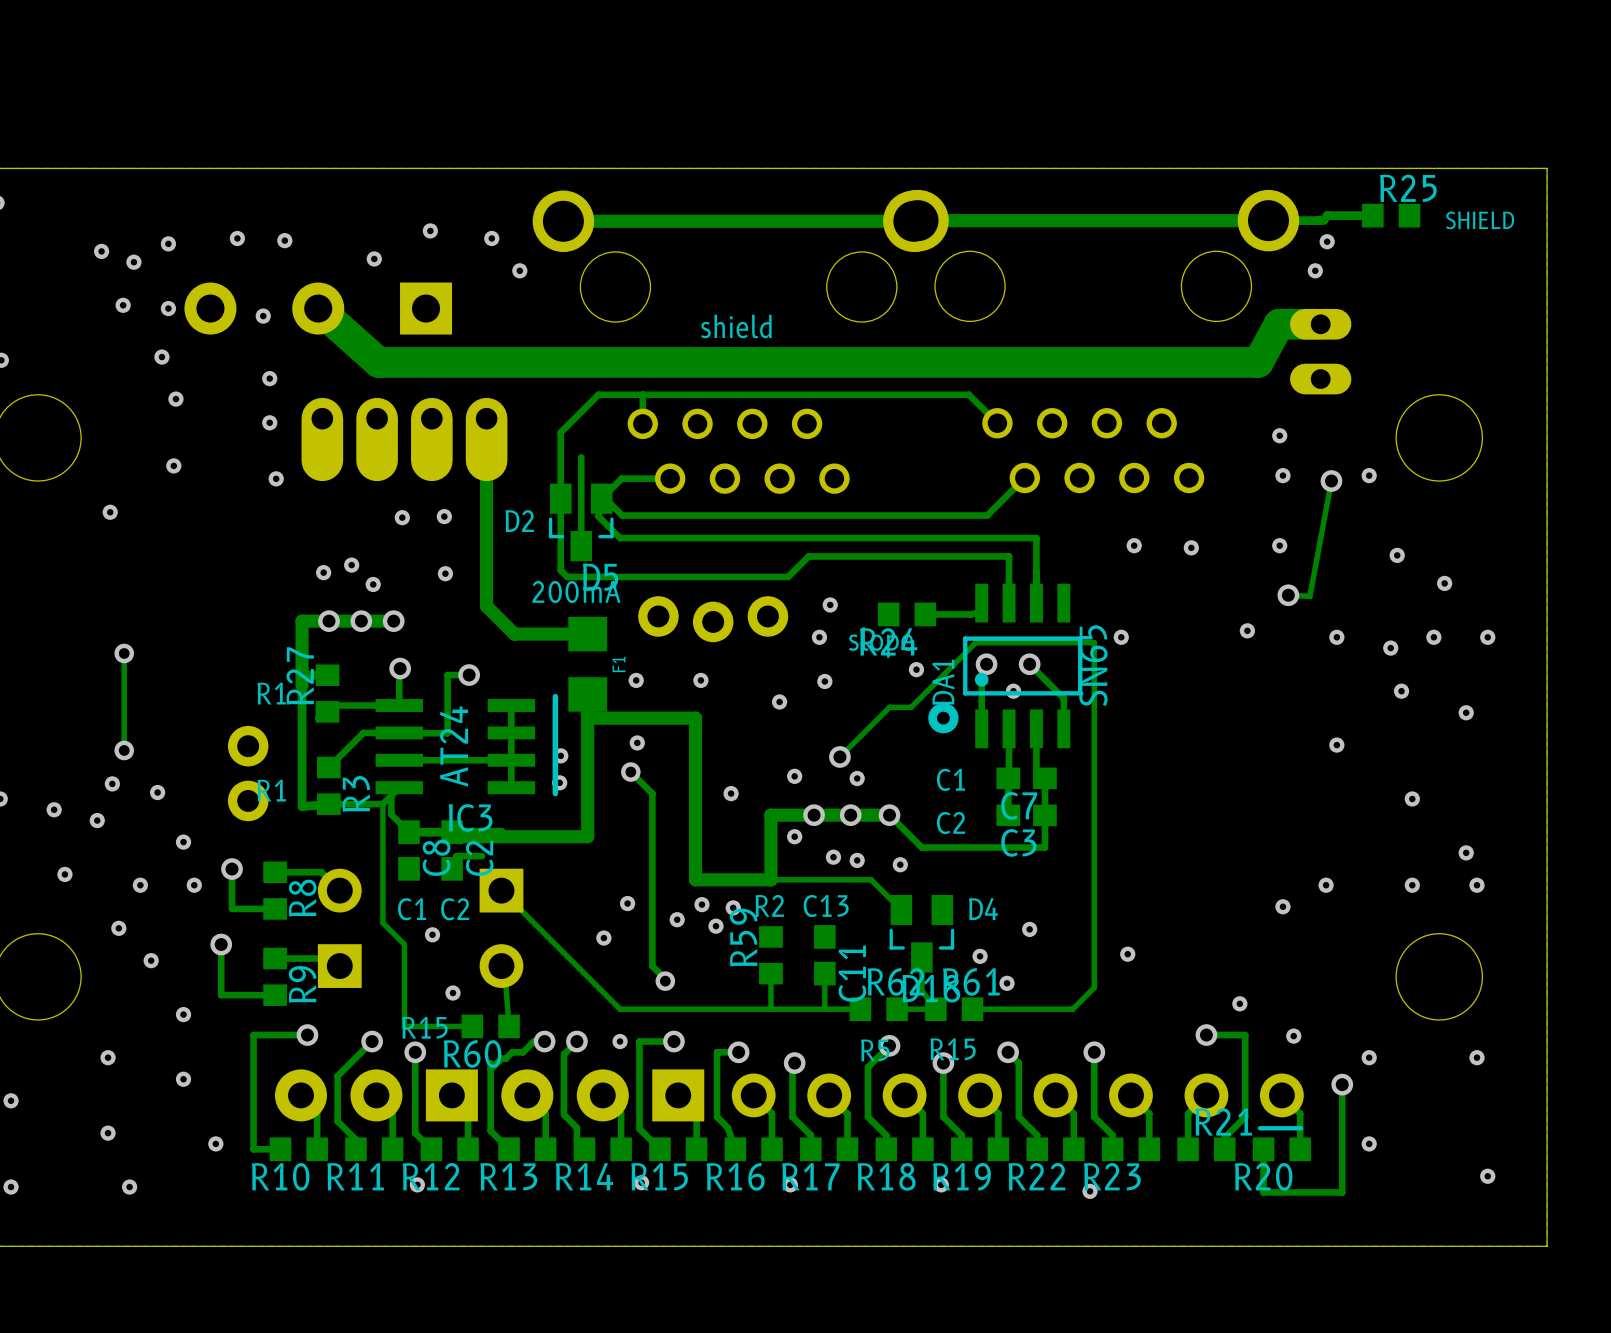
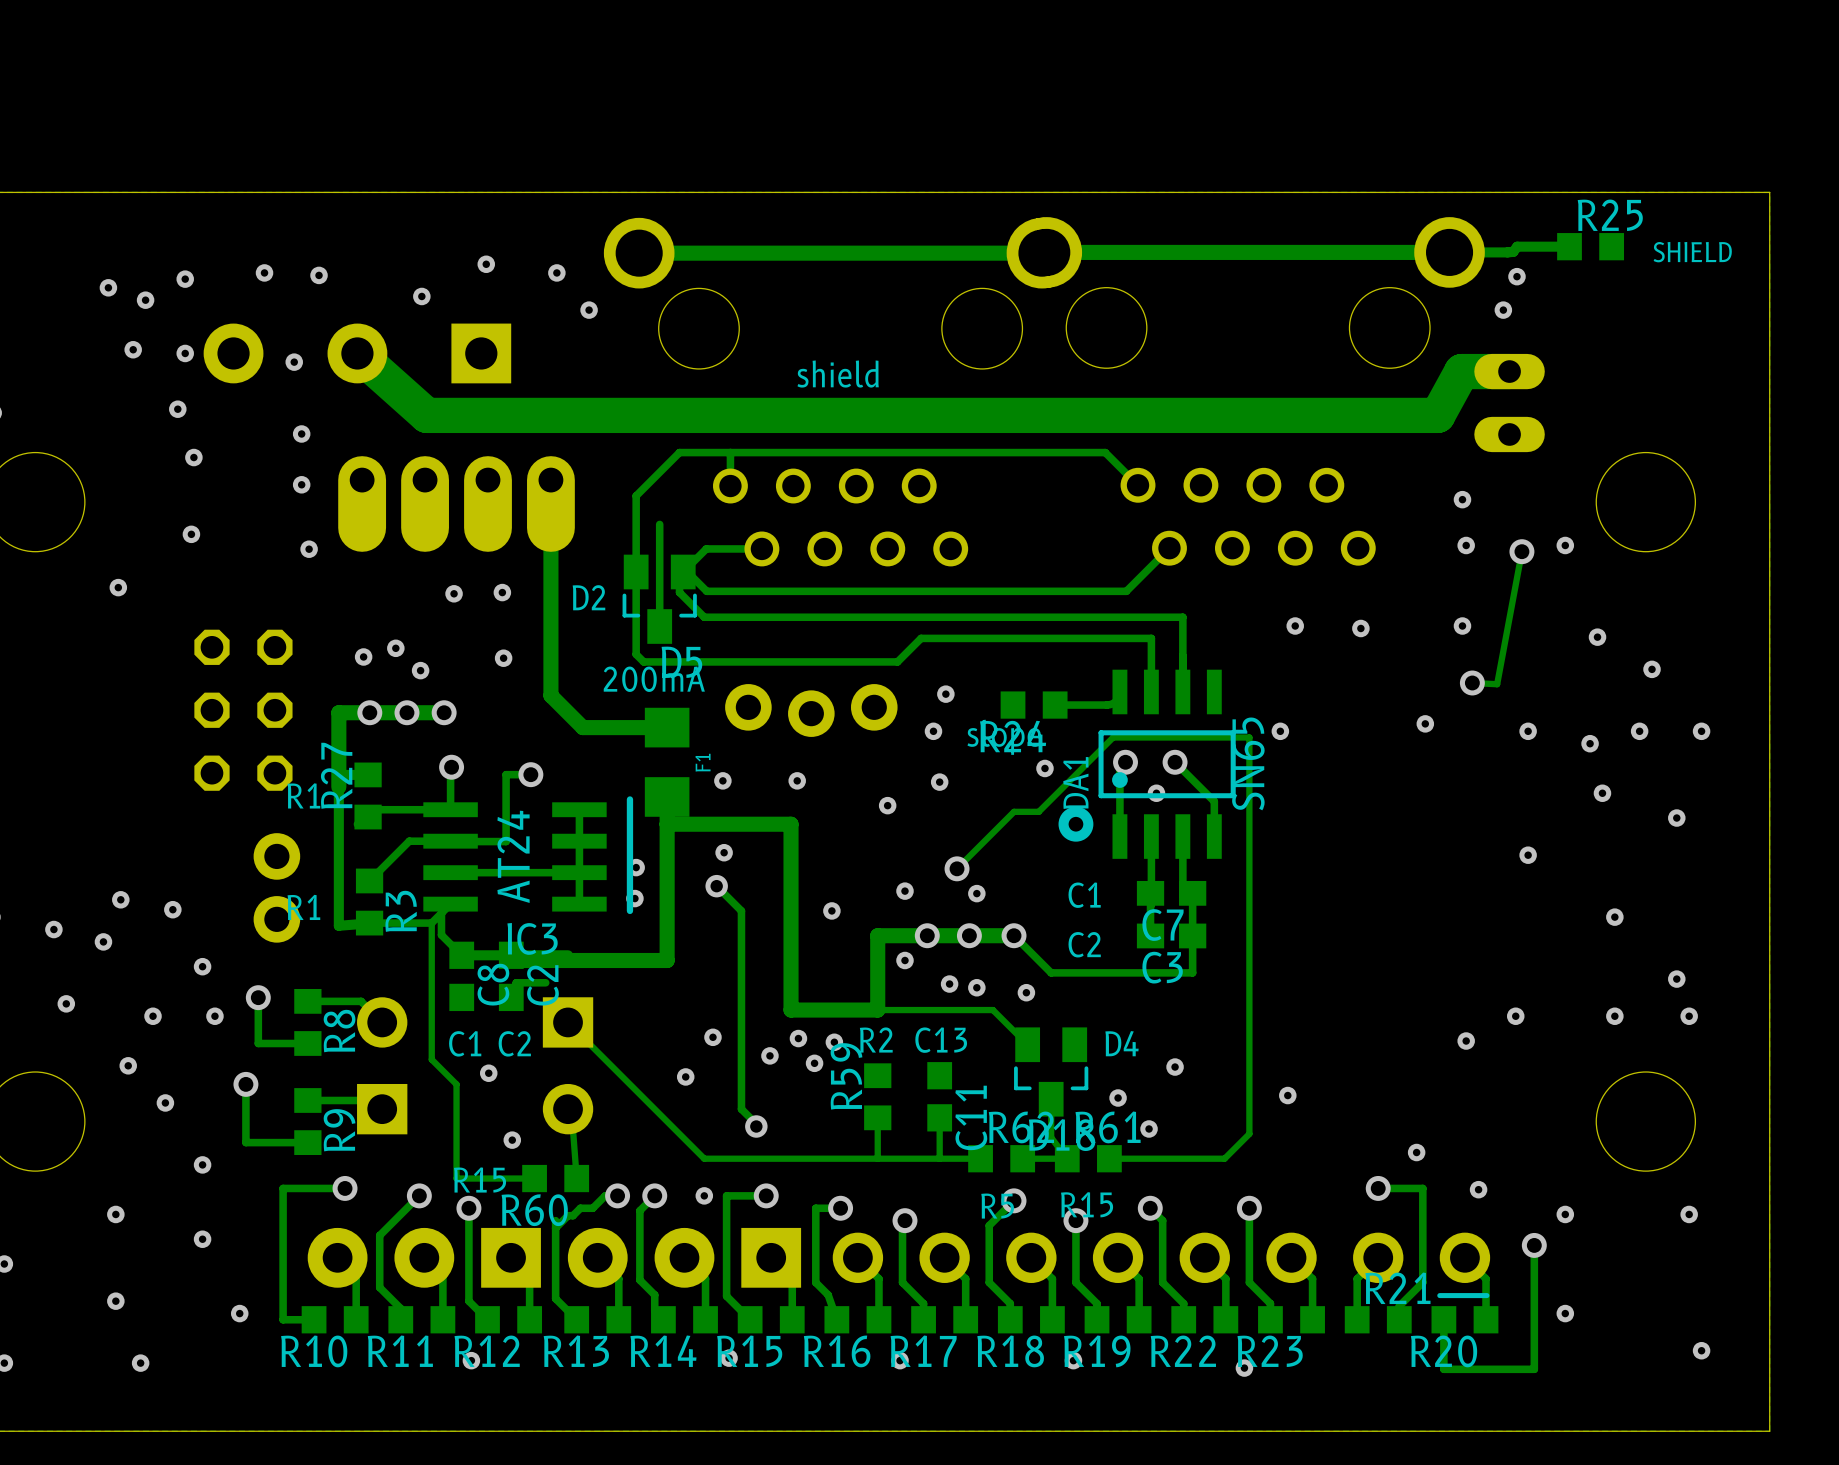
part: none -> (243, 710)
track: (124, 653) (124, 750) -> none
via: (124, 653) -> none
via: (124, 750) -> none

